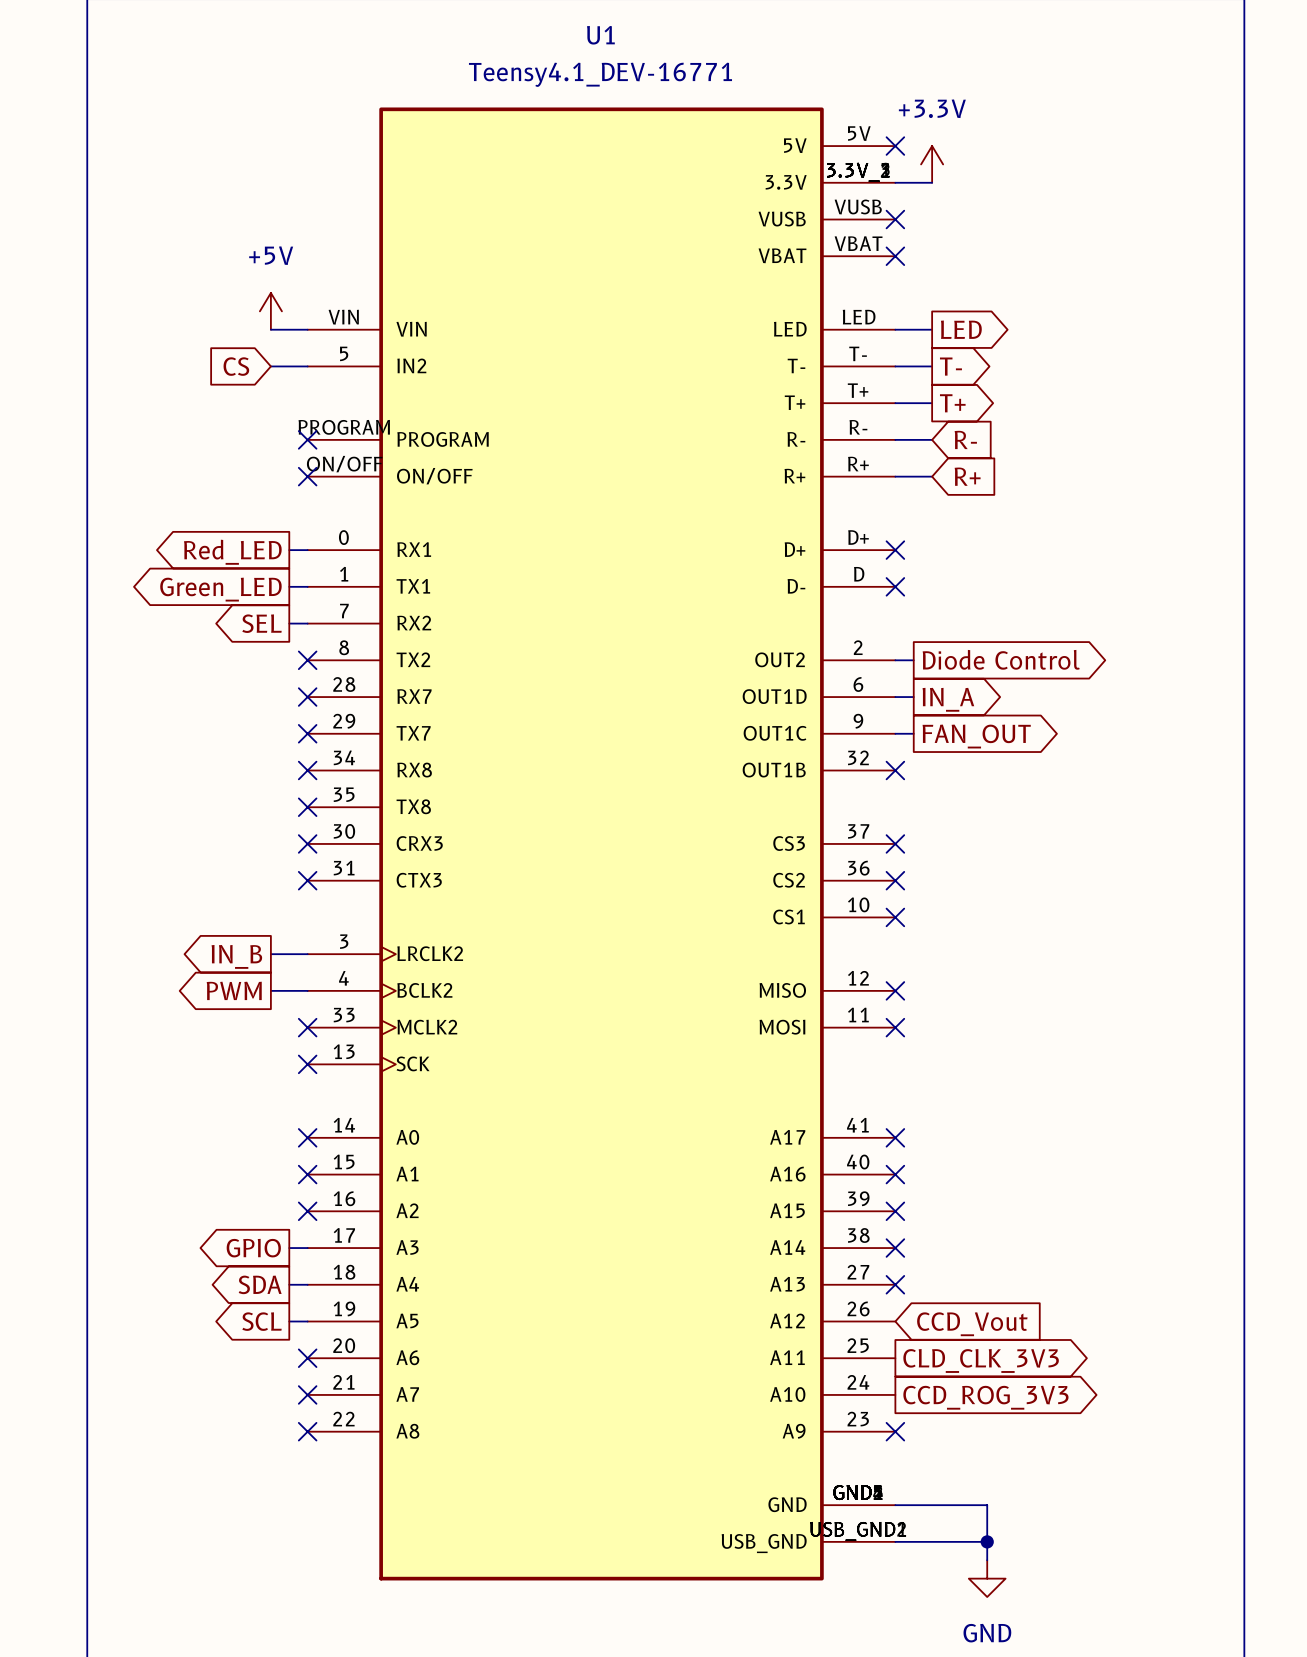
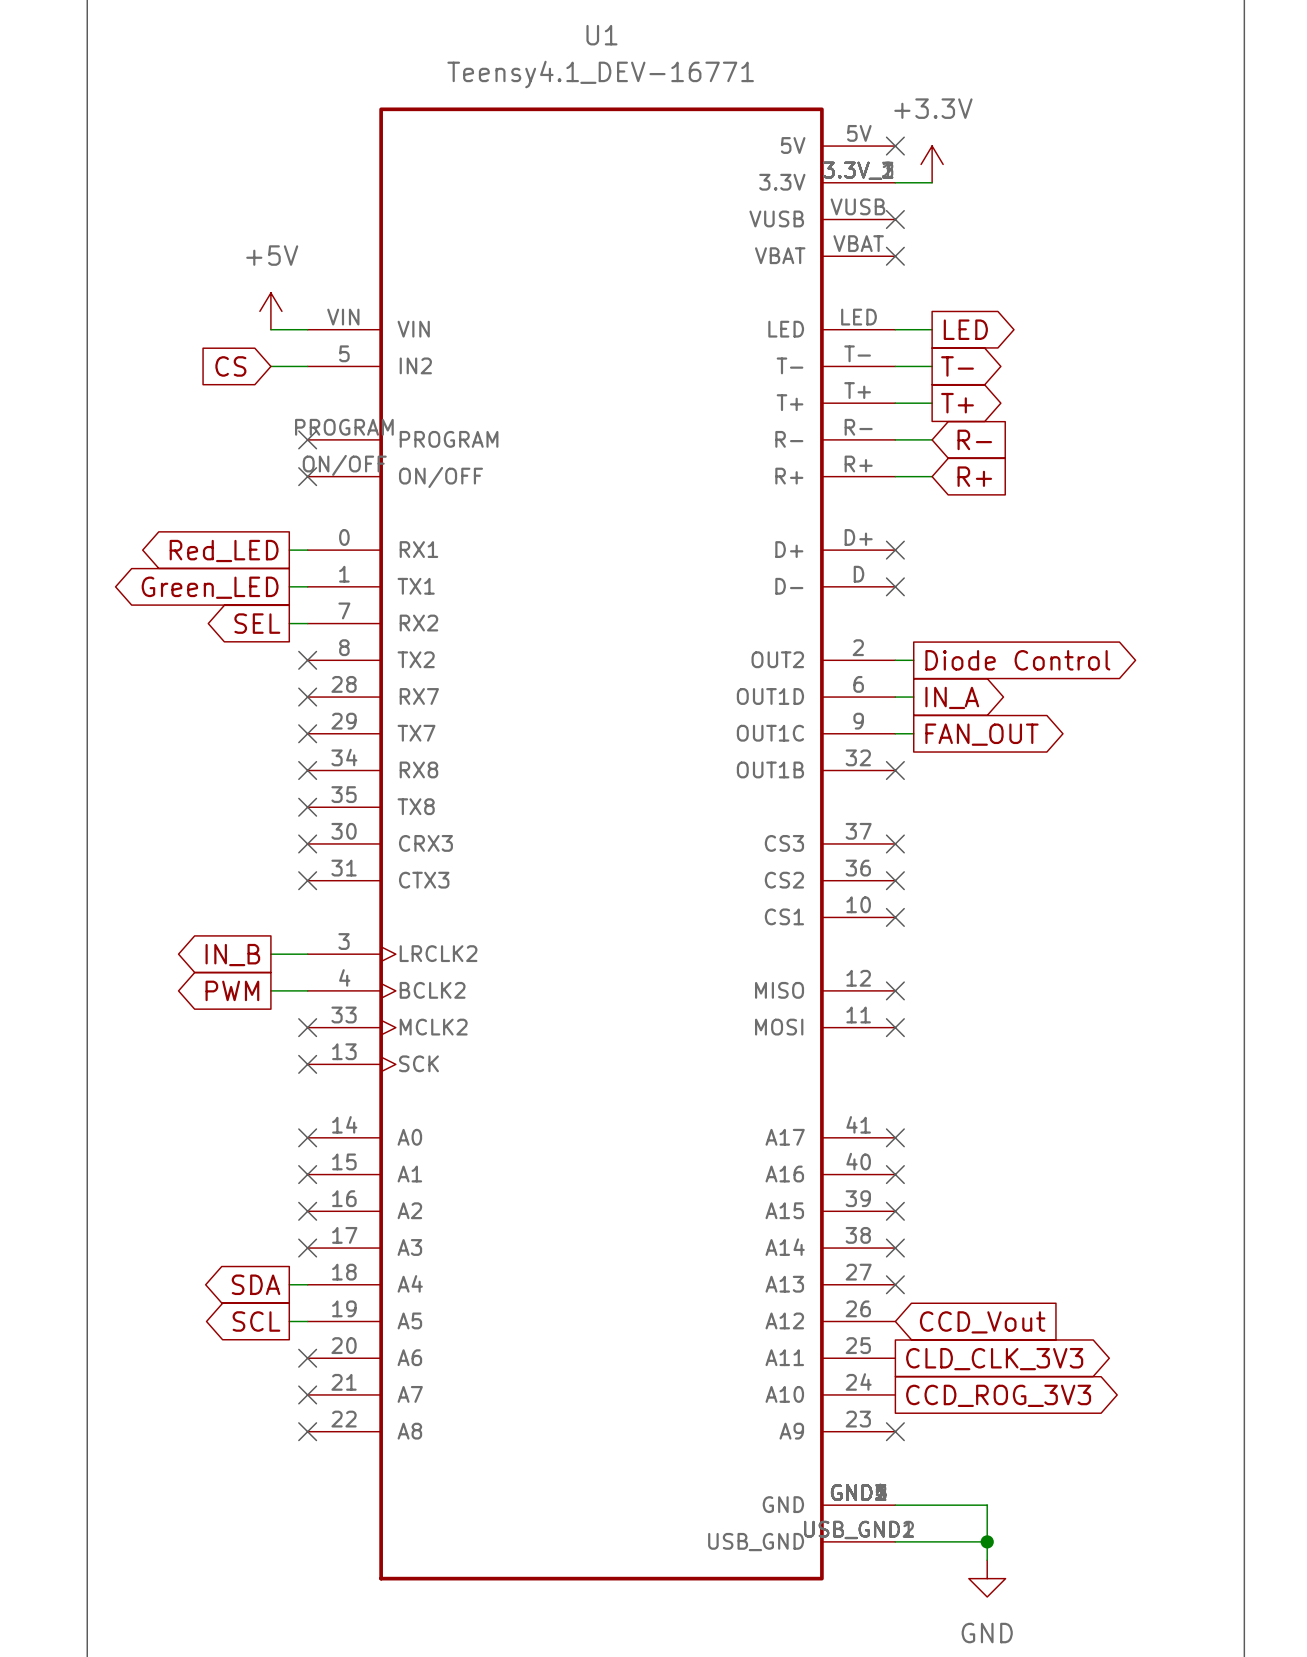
global label: GPIO (253, 1248) -> none
wire: (289, 1248) (307, 1248) -> none
no-connect mark: none -> (307, 1248)

